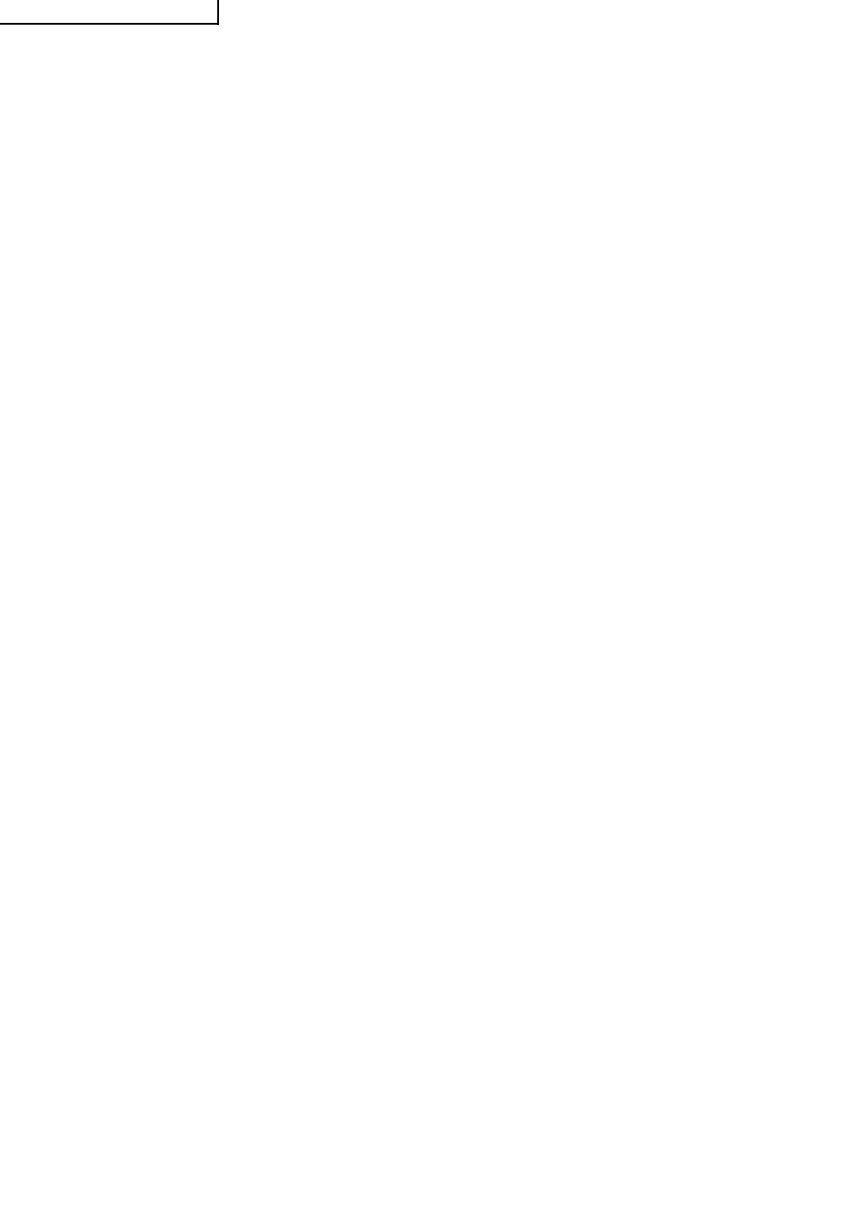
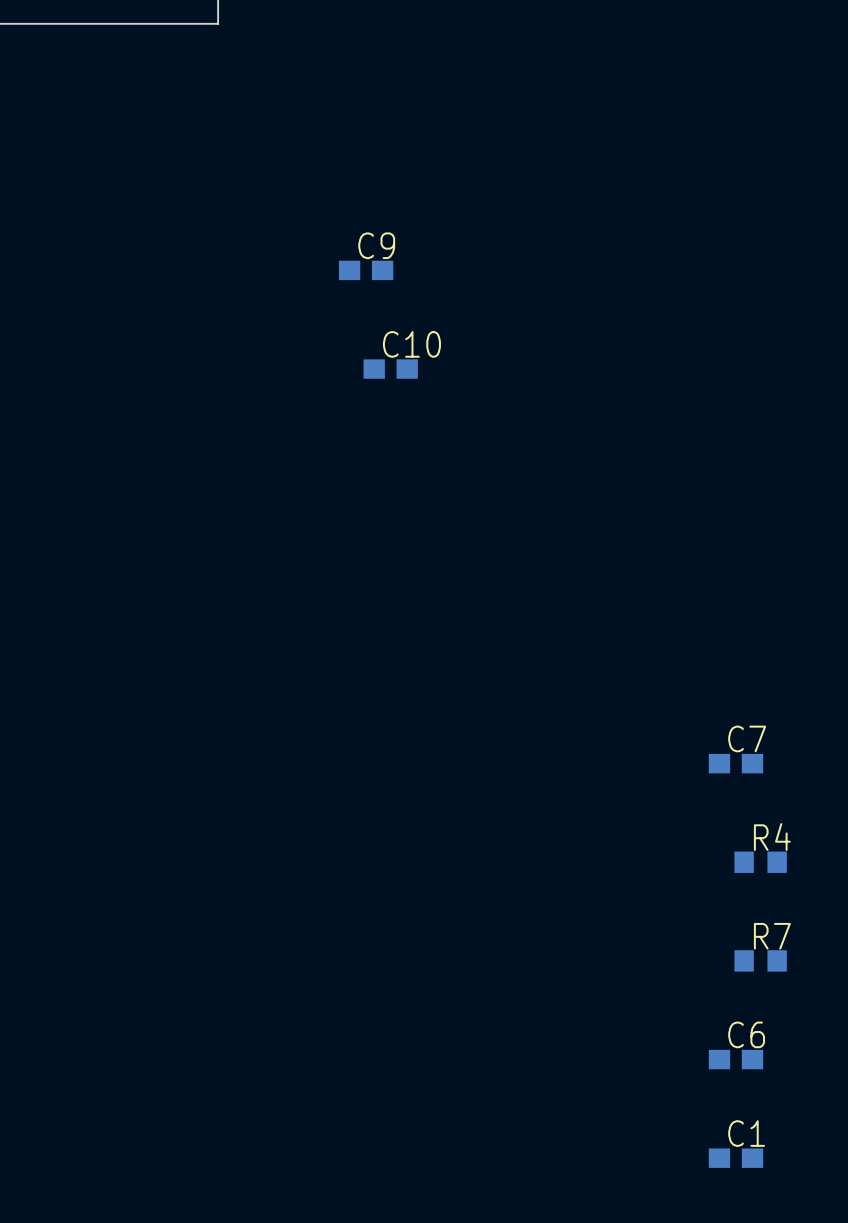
C9: none -> (366, 270)
C10: none -> (390, 369)
C7: none -> (735, 763)
R4: none -> (760, 862)
R7: none -> (760, 960)
C6: none -> (735, 1059)
C1: none -> (735, 1158)

